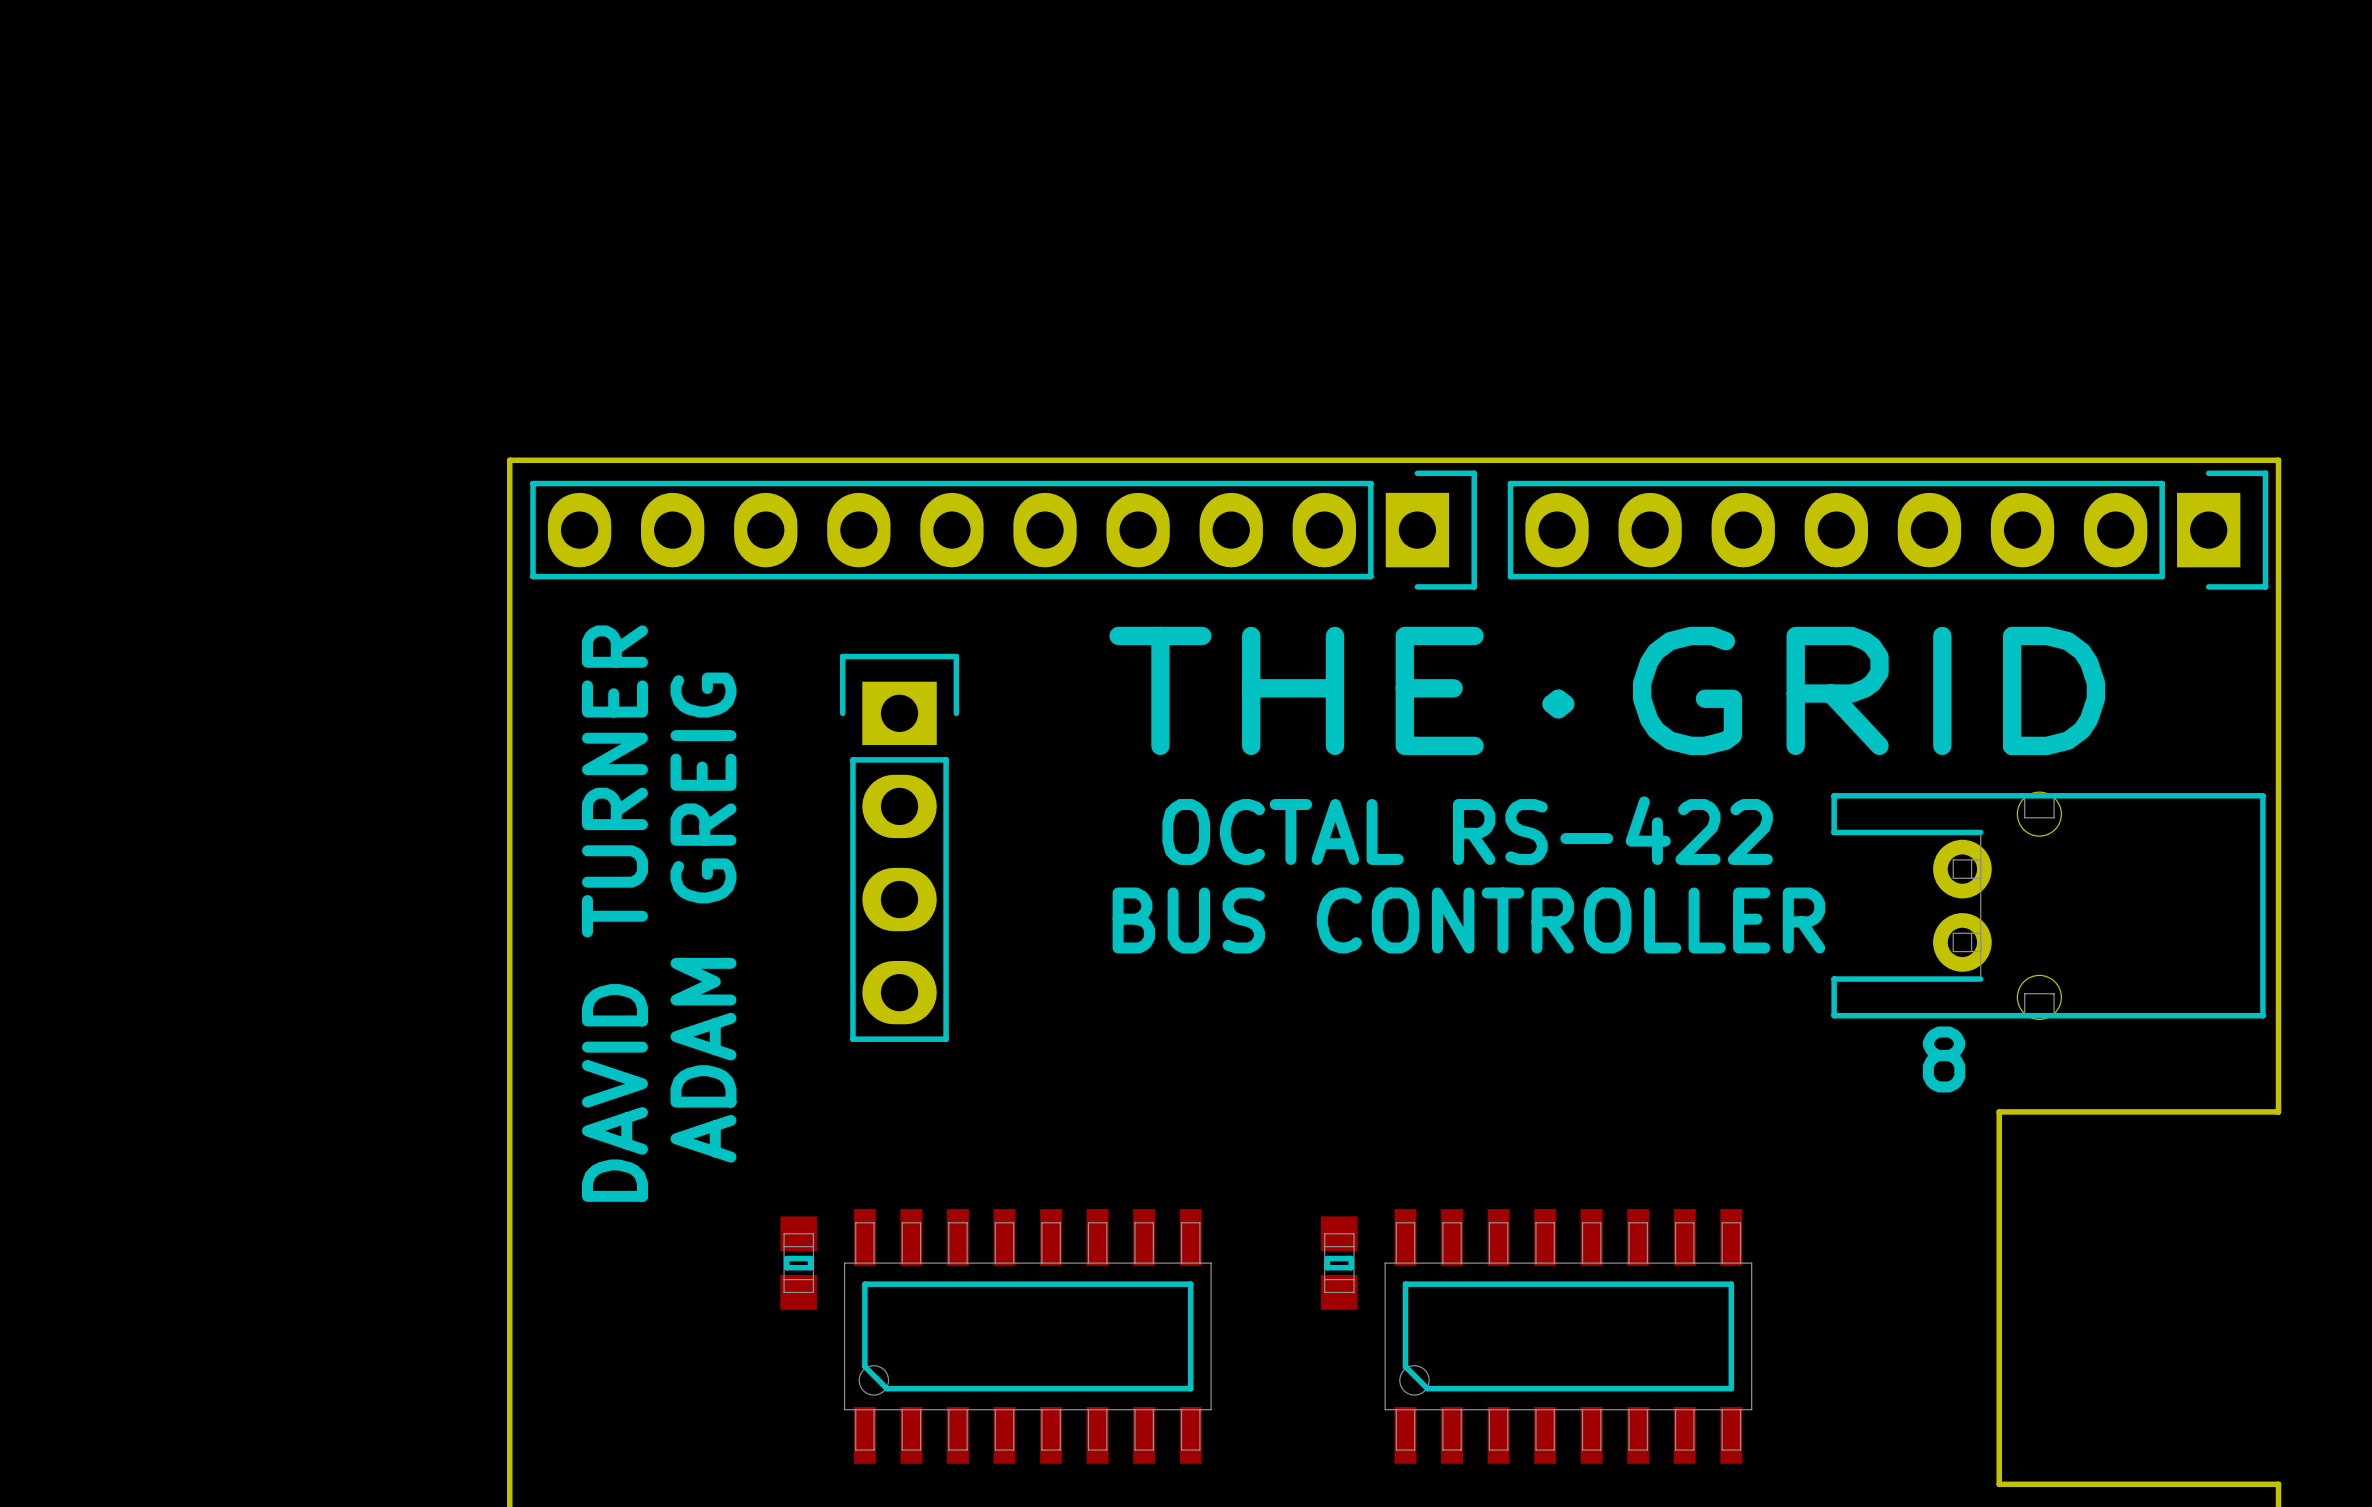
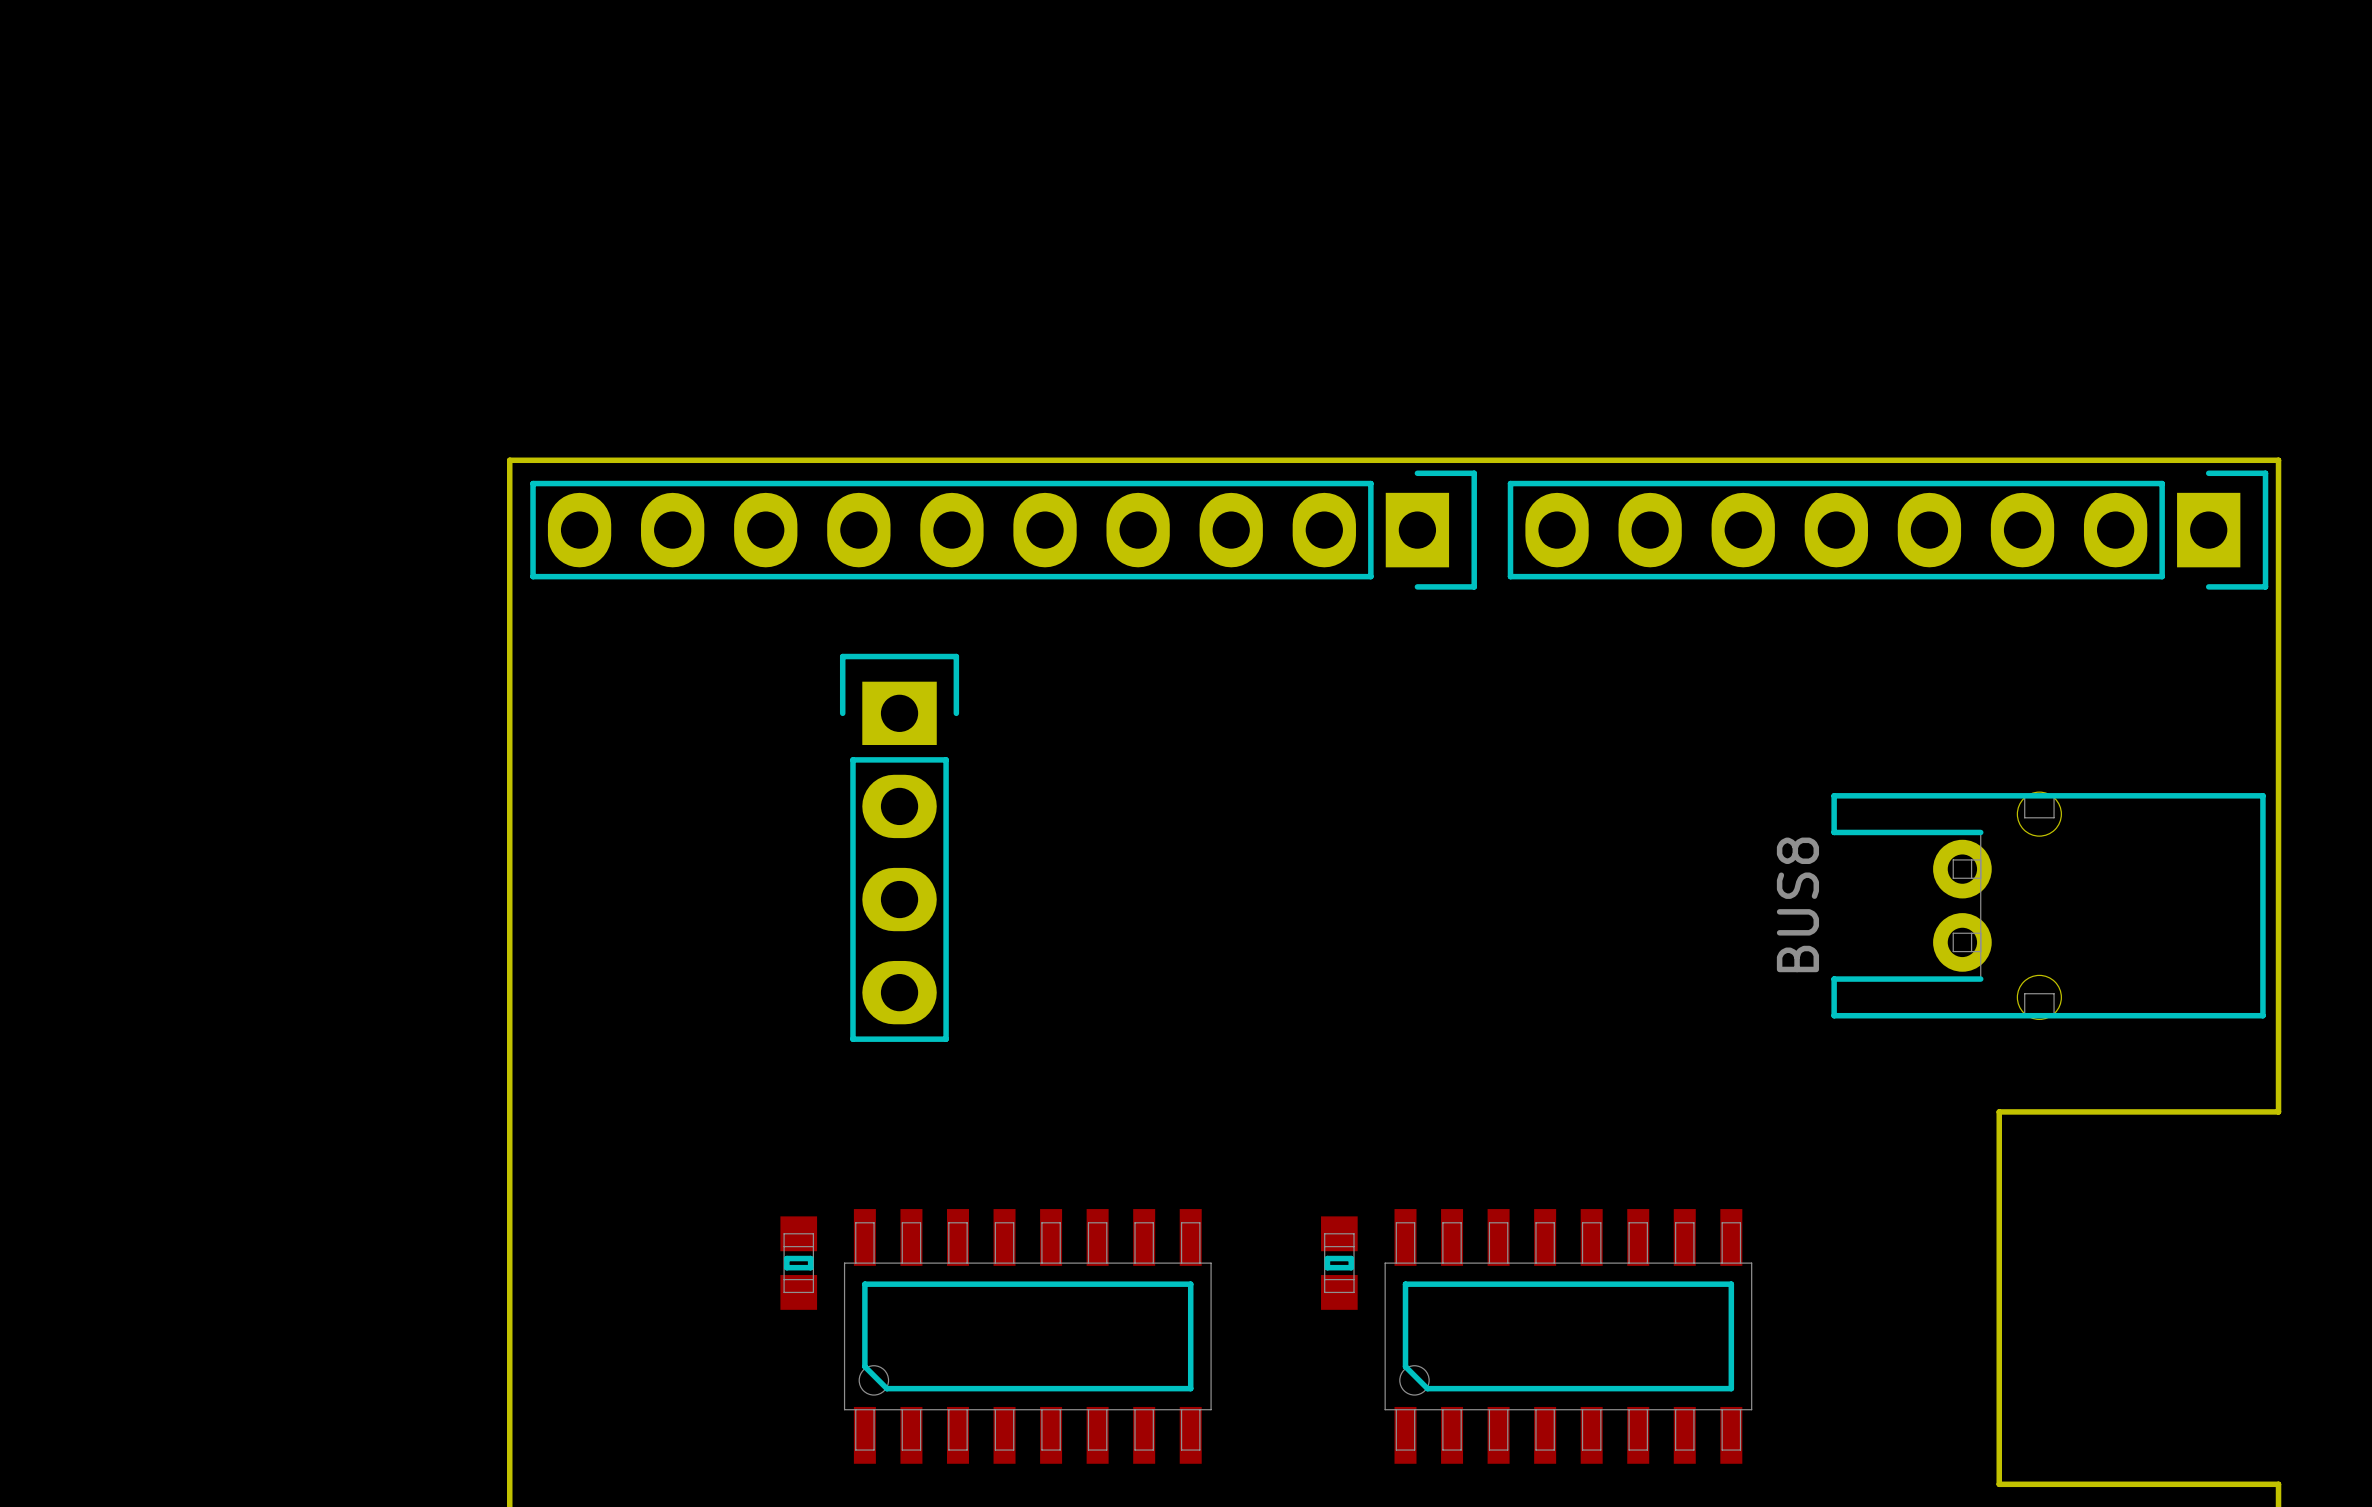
text: THE·GRID (1607, 690) -> none
text: OCTAL RS-422 (1467, 830) -> none
part value: none -> BUS8 (1797, 904)
text: DAVID TURNER (614, 913) -> none
text: ADAM GREIG (703, 917) -> none
text: BUS CONTROLLER (1468, 920) -> none
text: 8 (1944, 1059) -> none

